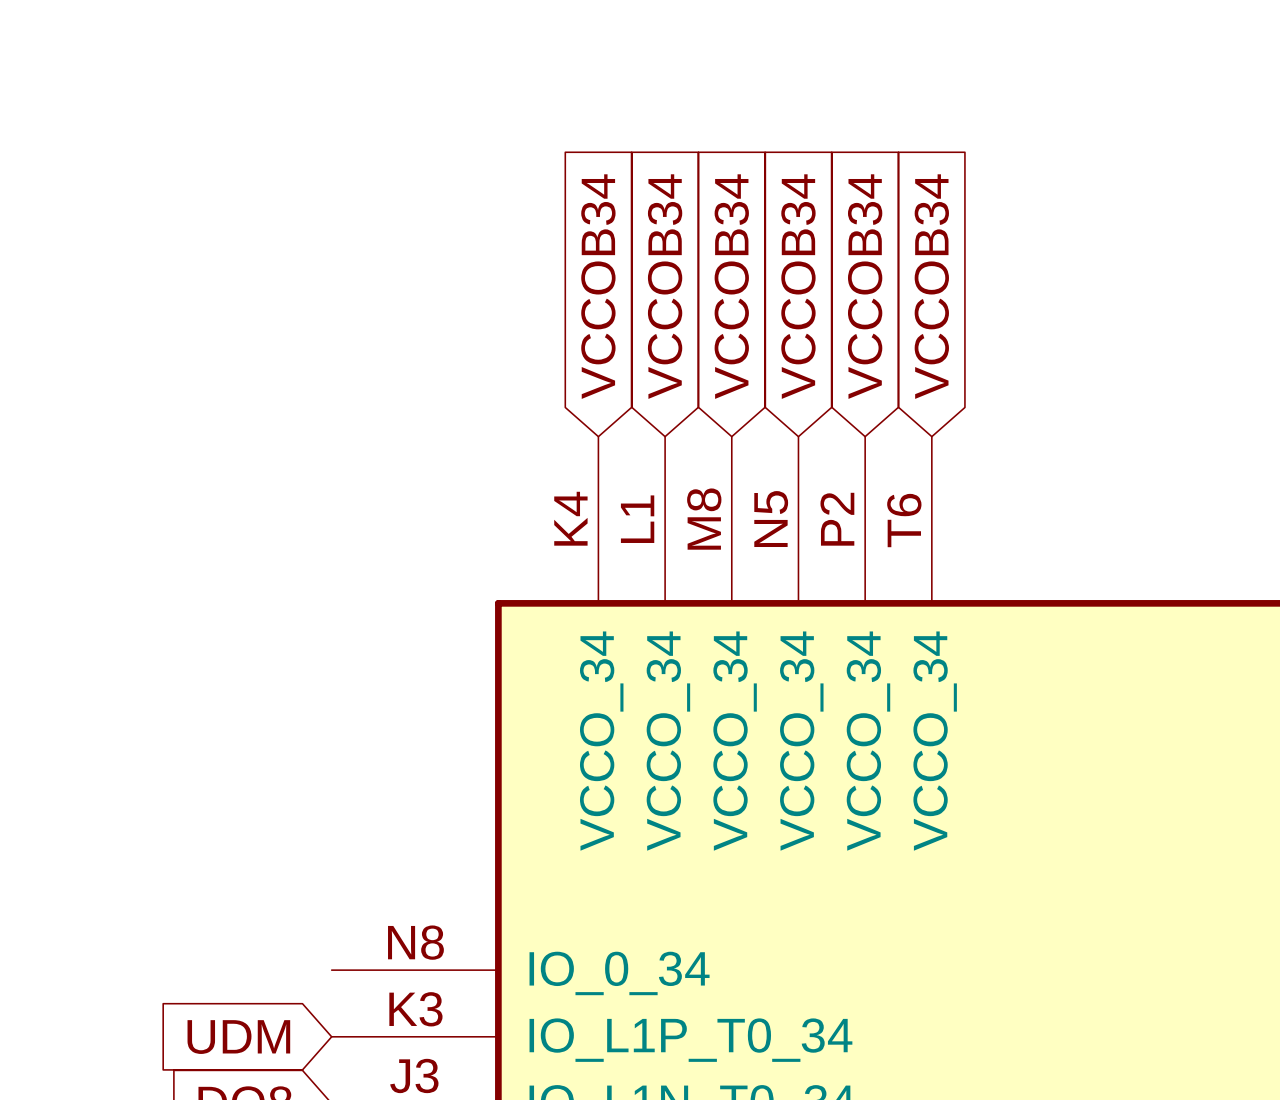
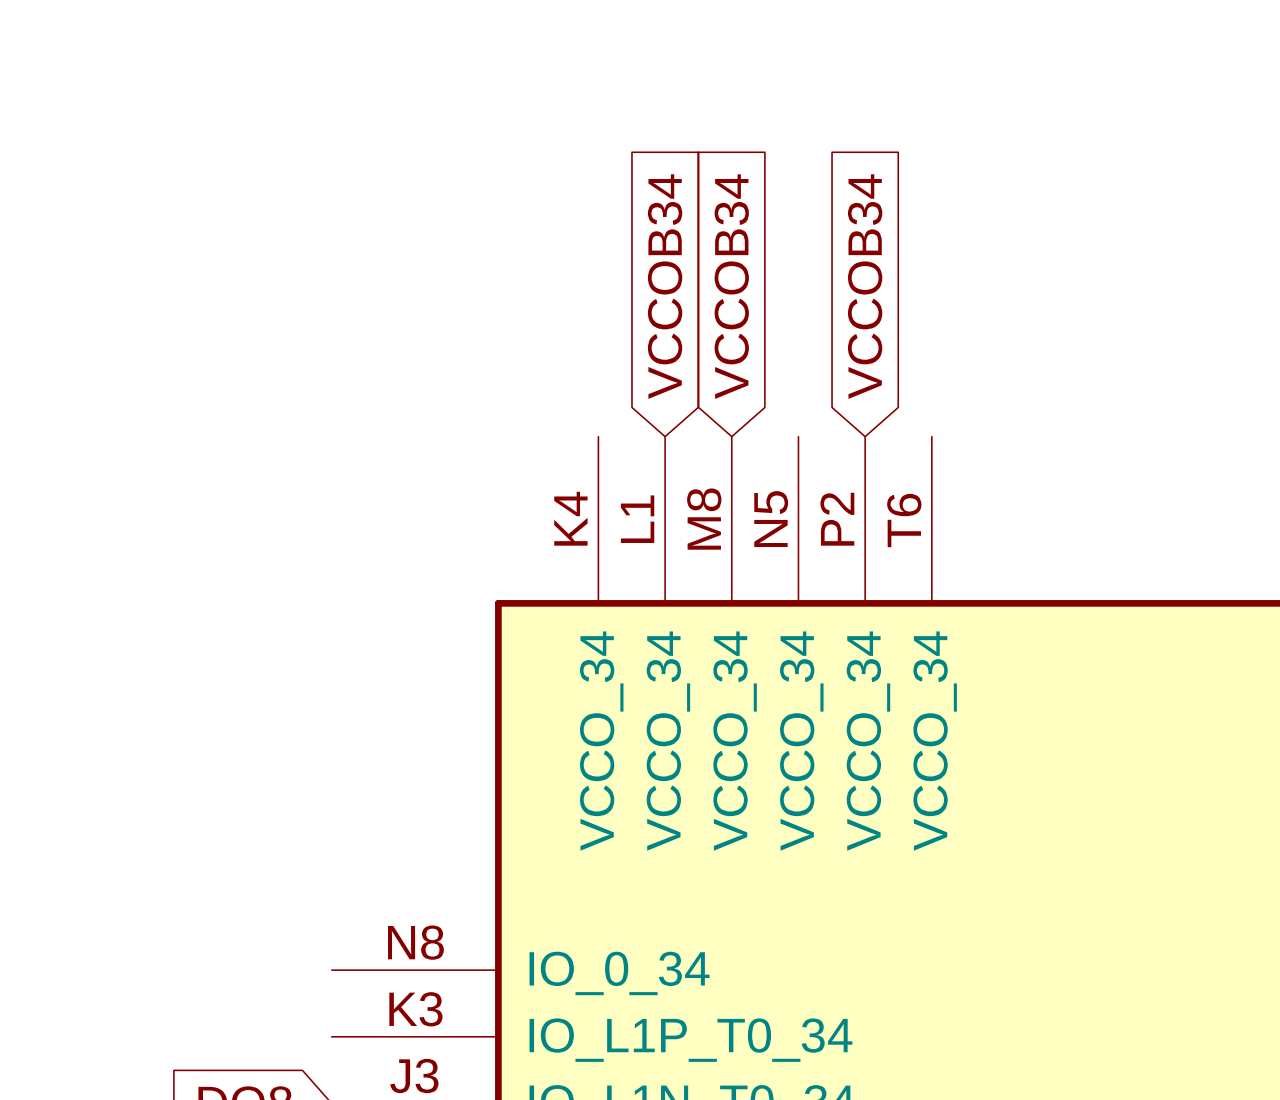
global label: VCCOB34 (598, 286) -> none
global label: VCCOB34 (798, 286) -> none
global label: VCCOB34 (931, 286) -> none
global label: UDM (238, 1037) -> none

